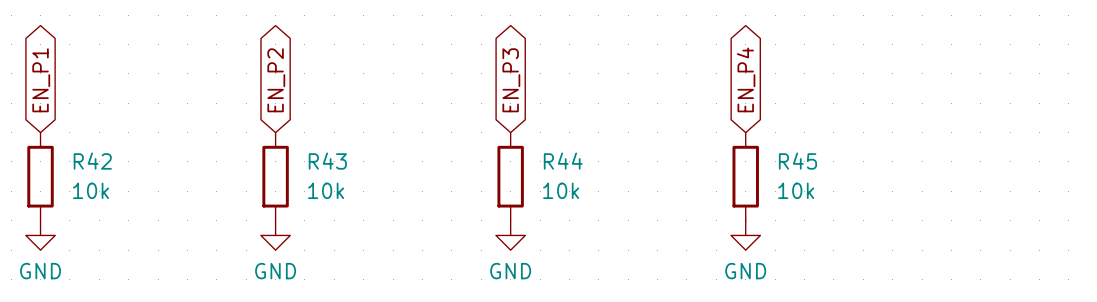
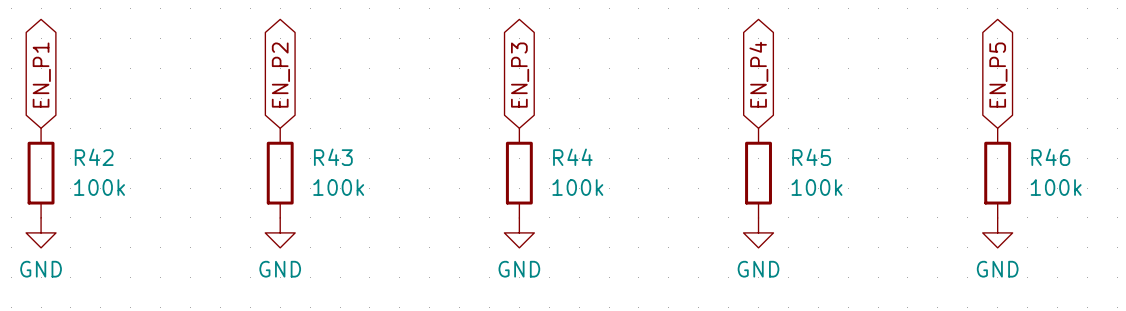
global label: none -> EN_P5 (998, 75)
R46: none -> 100k (997, 173)
R42 value: 10k (91, 190) -> 100k (99, 187)
R43 value: 10k (326, 190) -> 100k (338, 187)
R44 value: 10k (561, 190) -> 100k (577, 187)
R45 value: 10k (796, 190) -> 100k (817, 187)
power symbol: none -> GND (997, 232)

